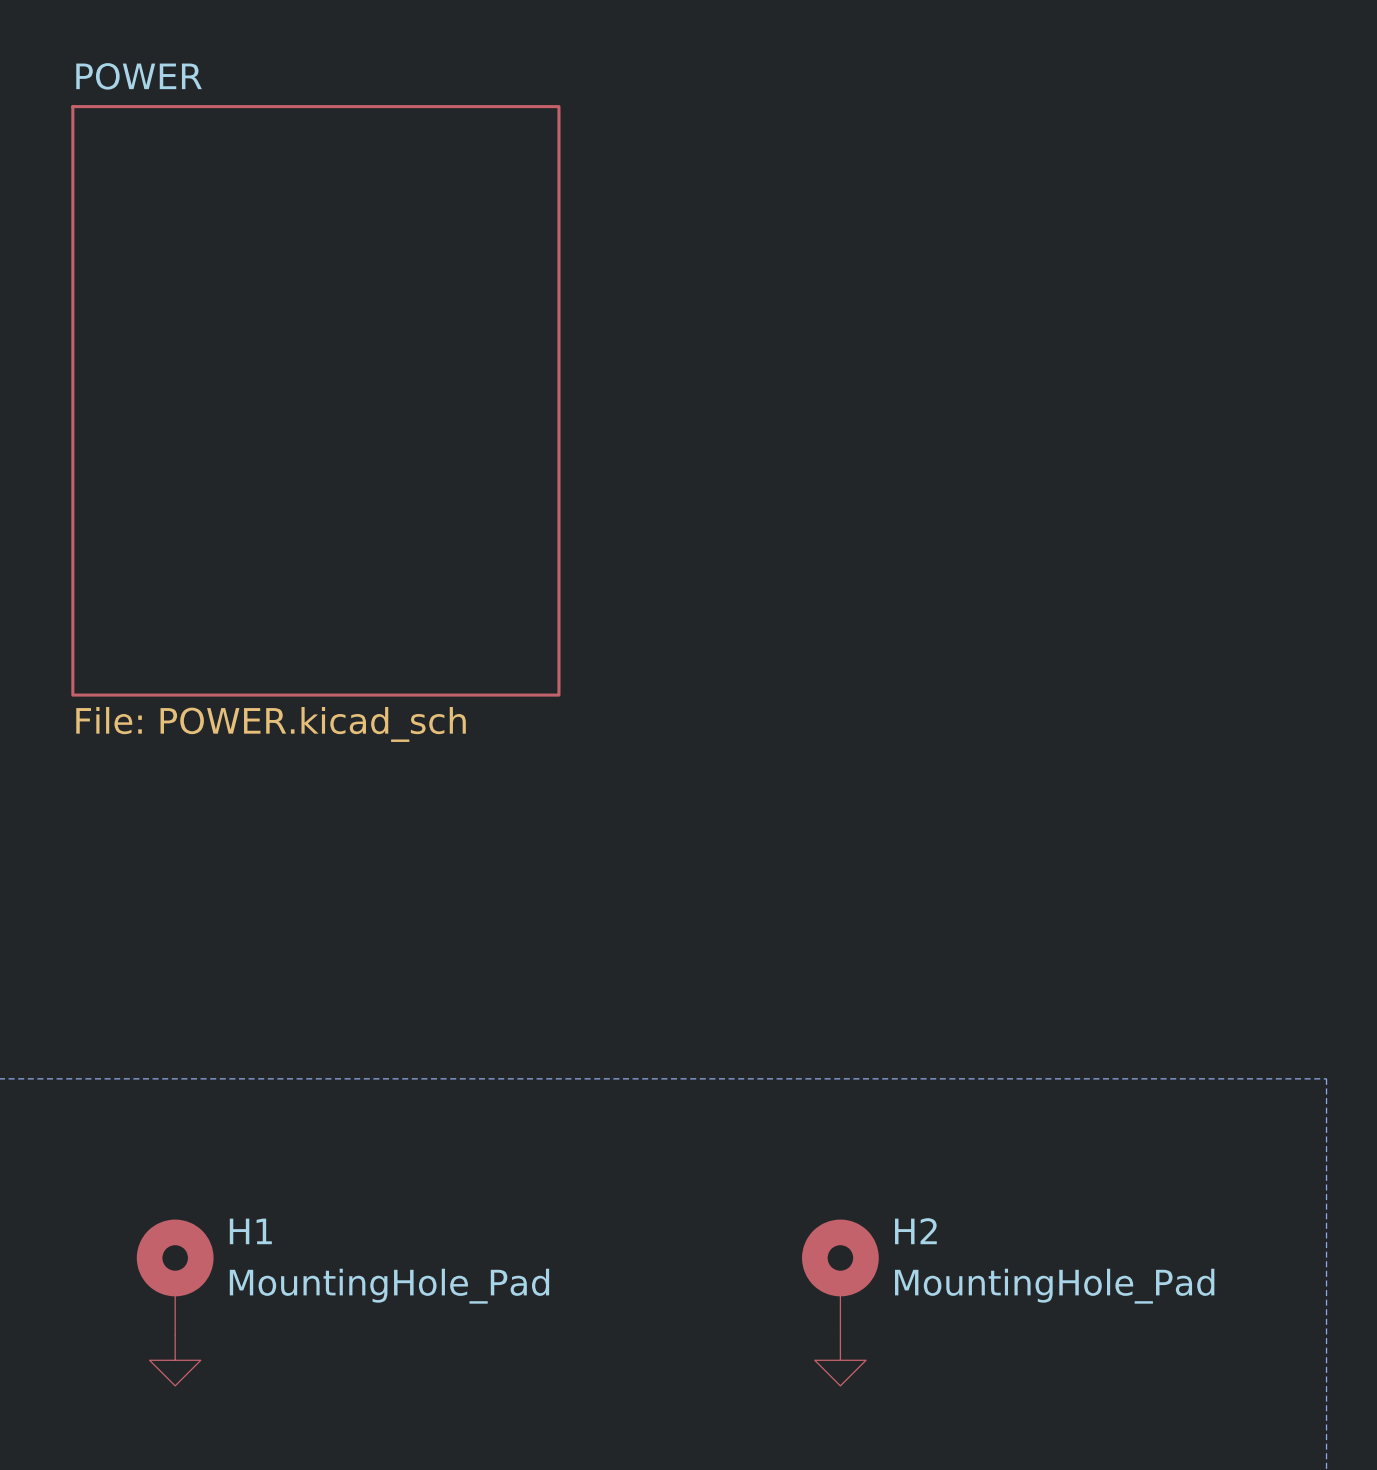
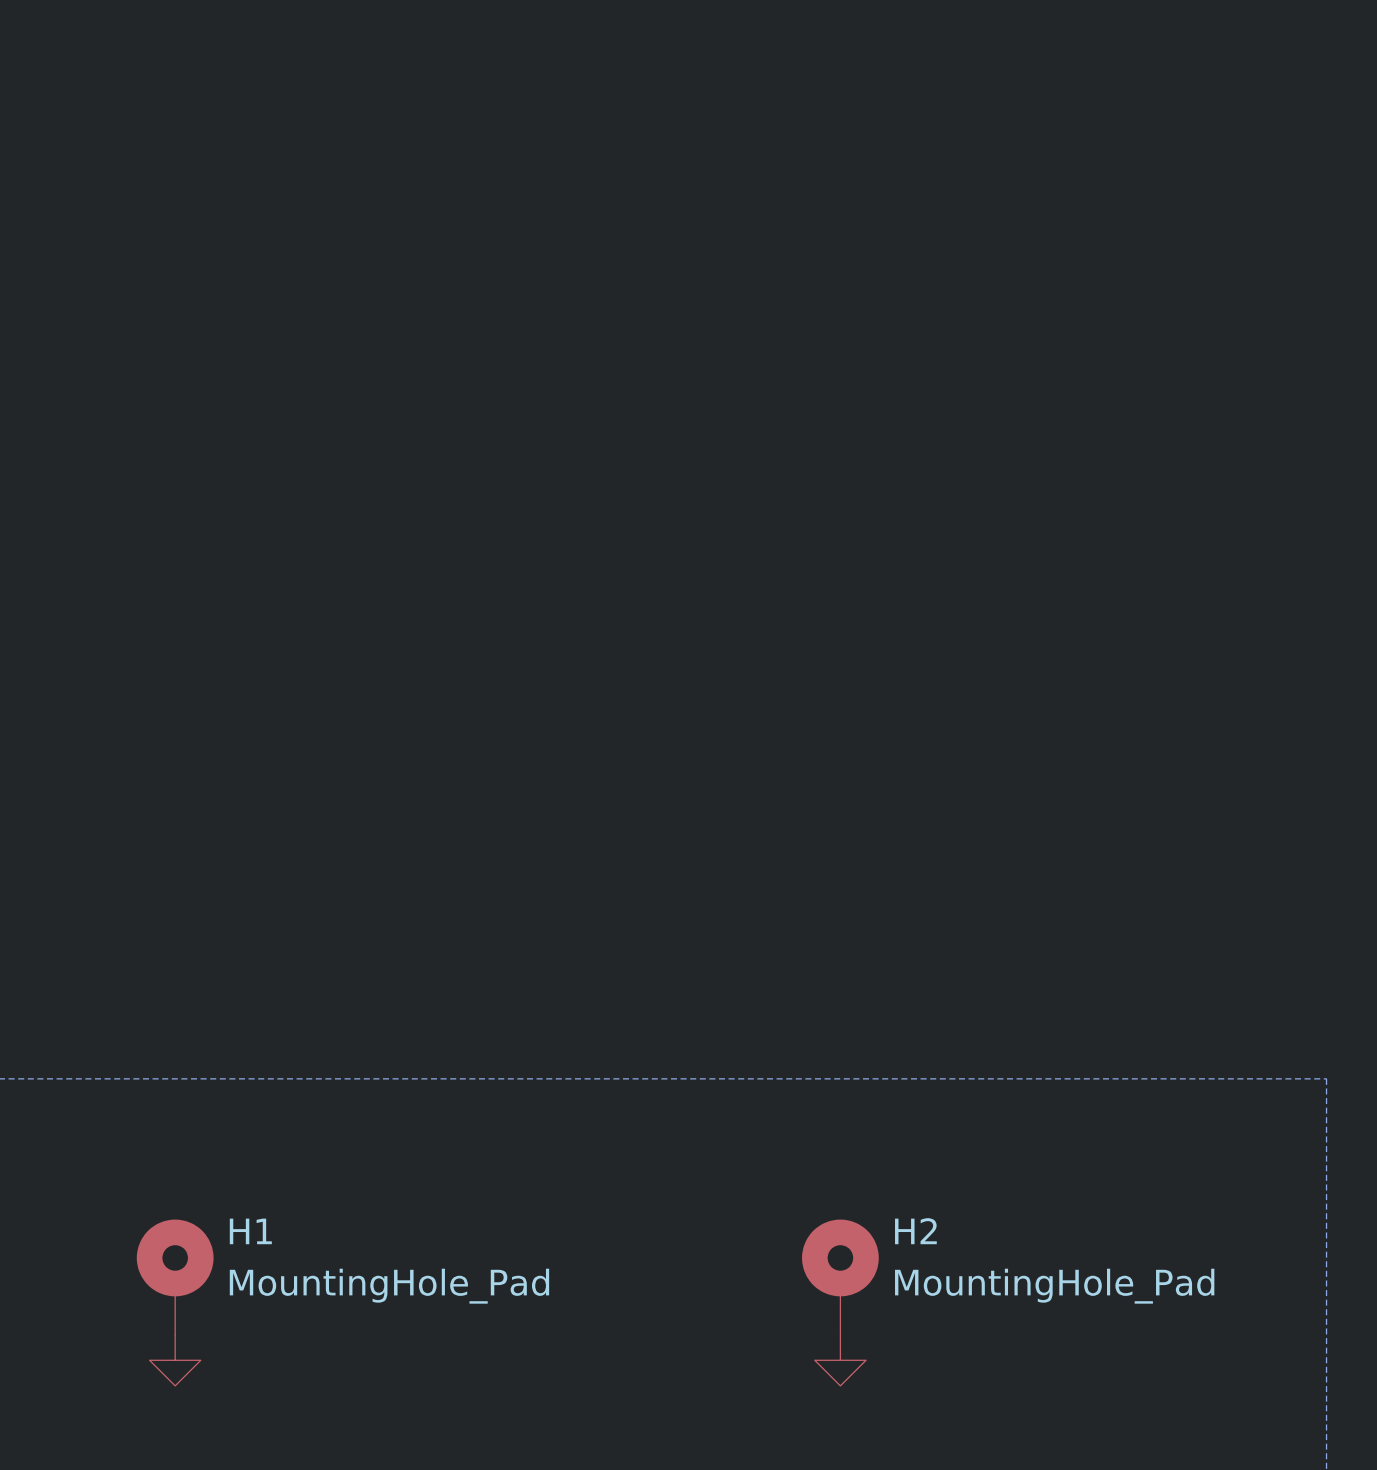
sheet POWER: File: POWER.kicad_sch (315, 400) -> none

